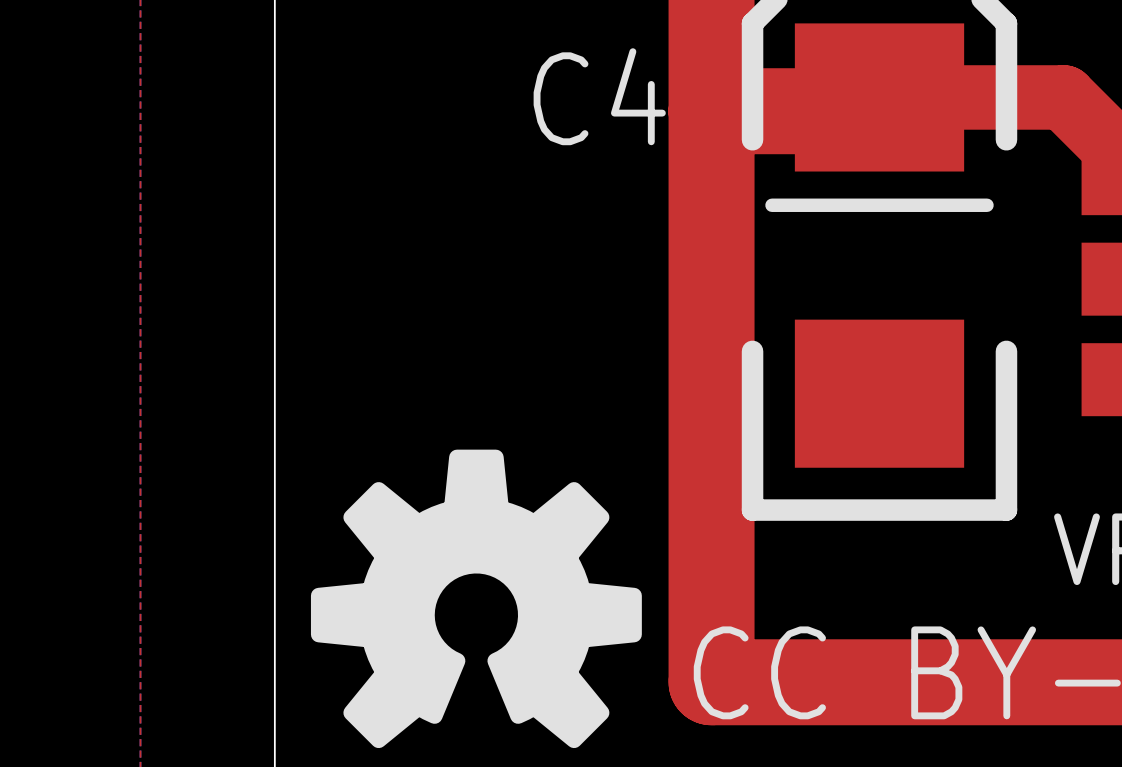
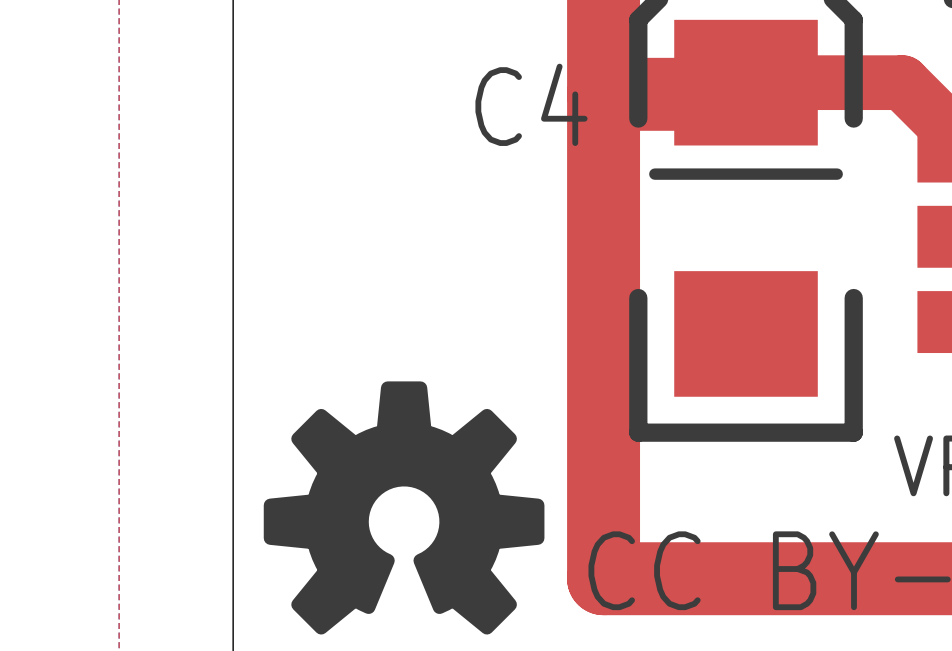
C4 name position: C4 (599, 96) -> C4 (531, 104)

